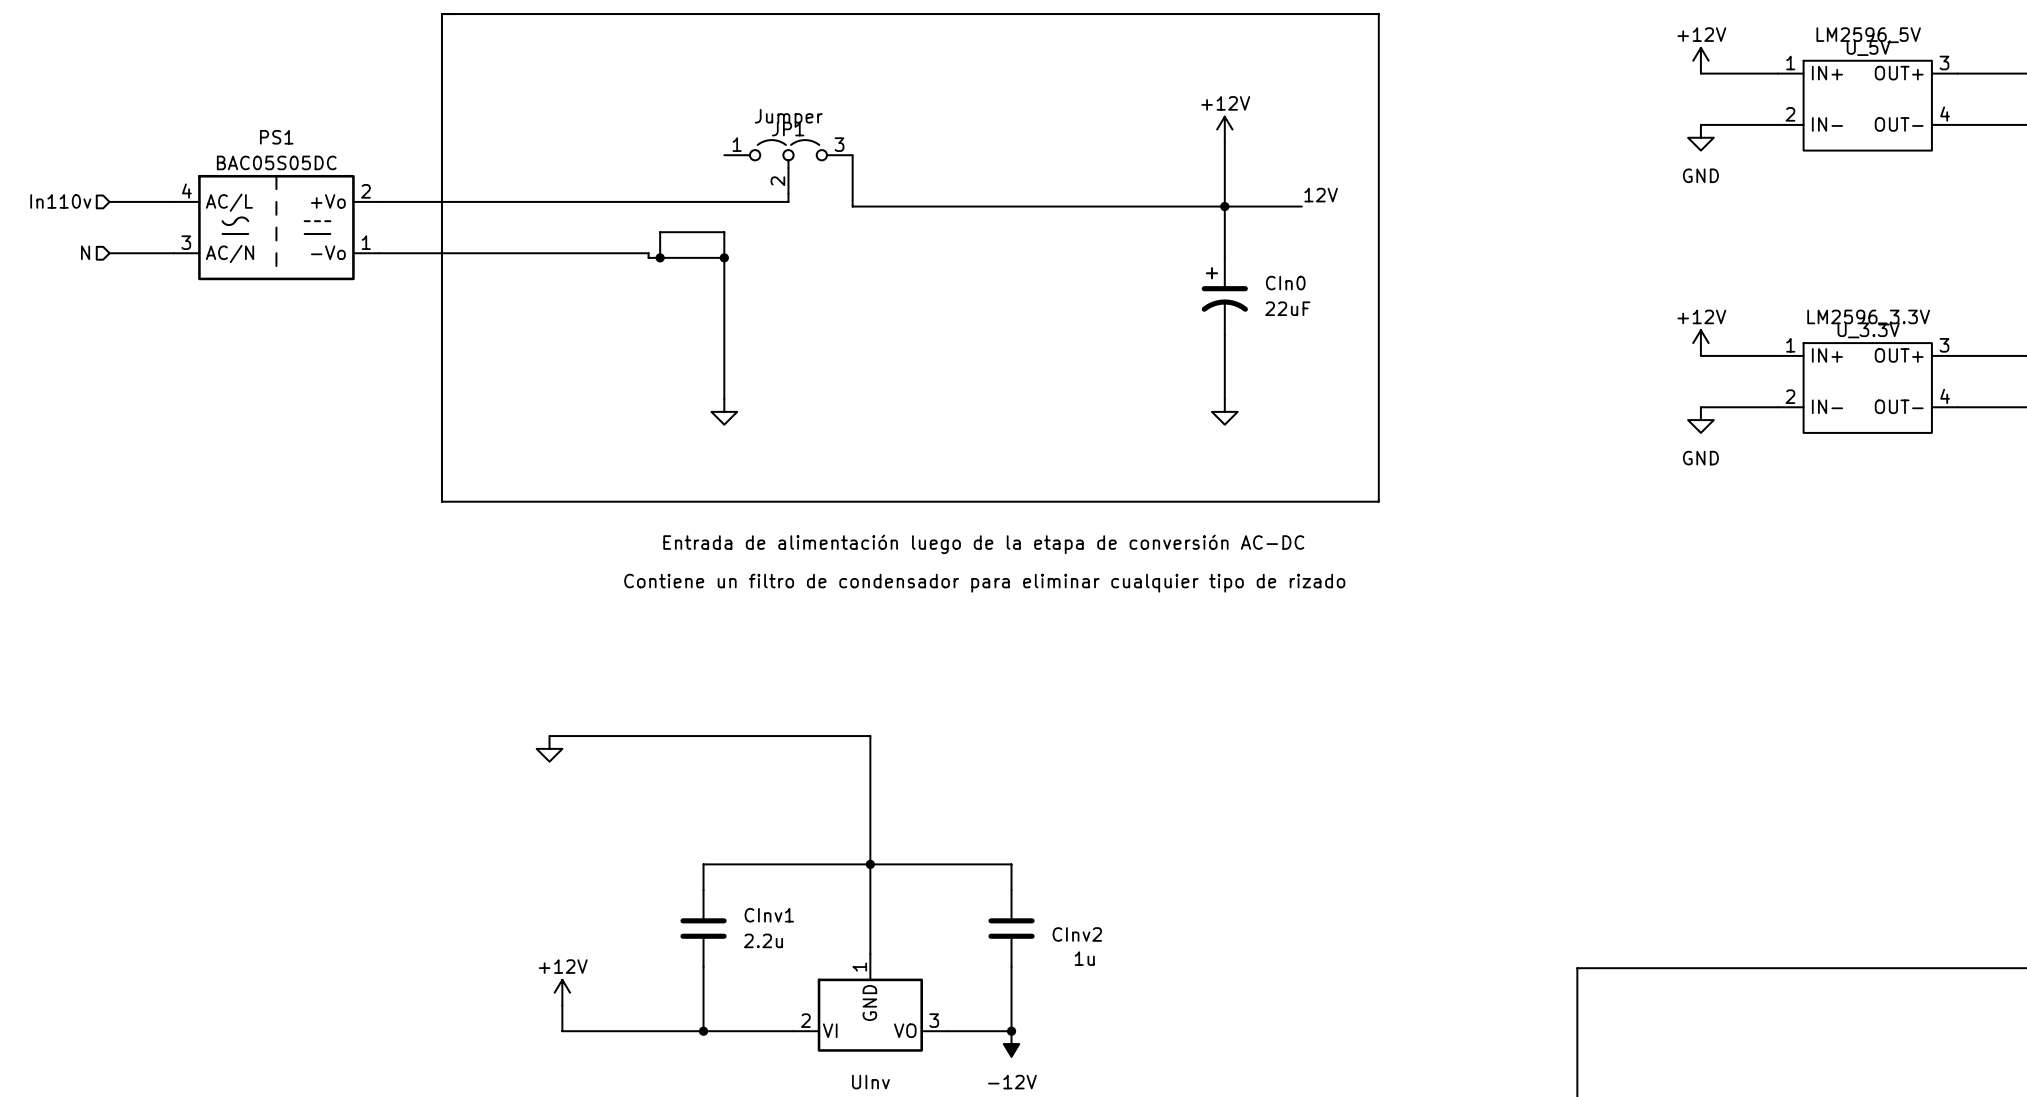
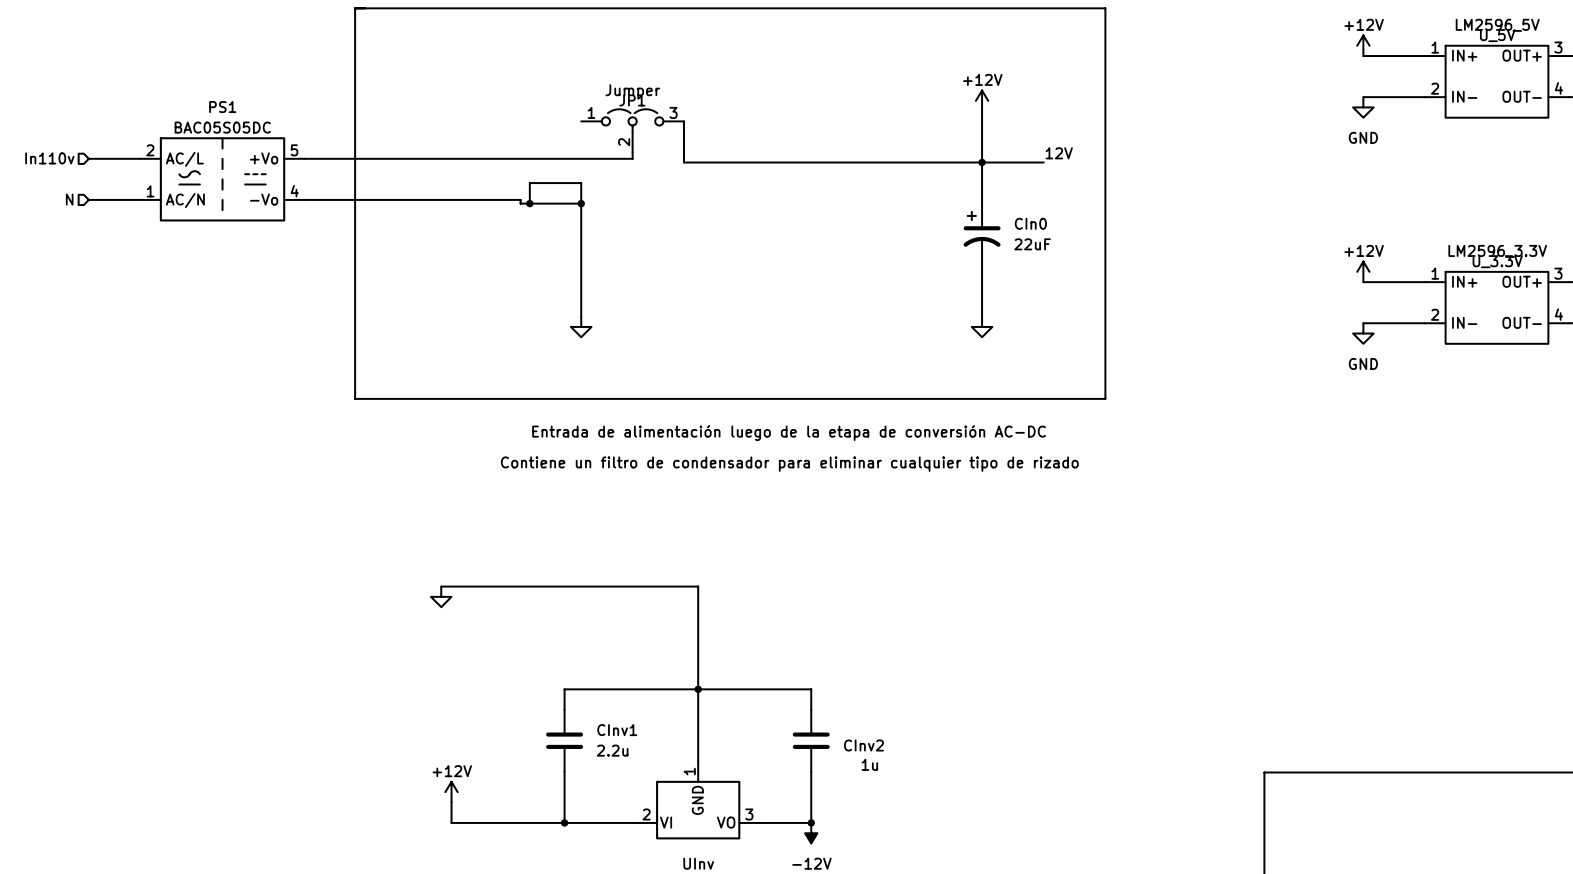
PS1 pin number: 4 (186, 191) -> 2 (150, 150)
PS1 pin number: 2 (365, 191) -> 5 (294, 150)
PS1 pin number: 3 (186, 242) -> 1 (150, 191)
PS1 pin number: 1 (366, 242) -> 4 (294, 191)

